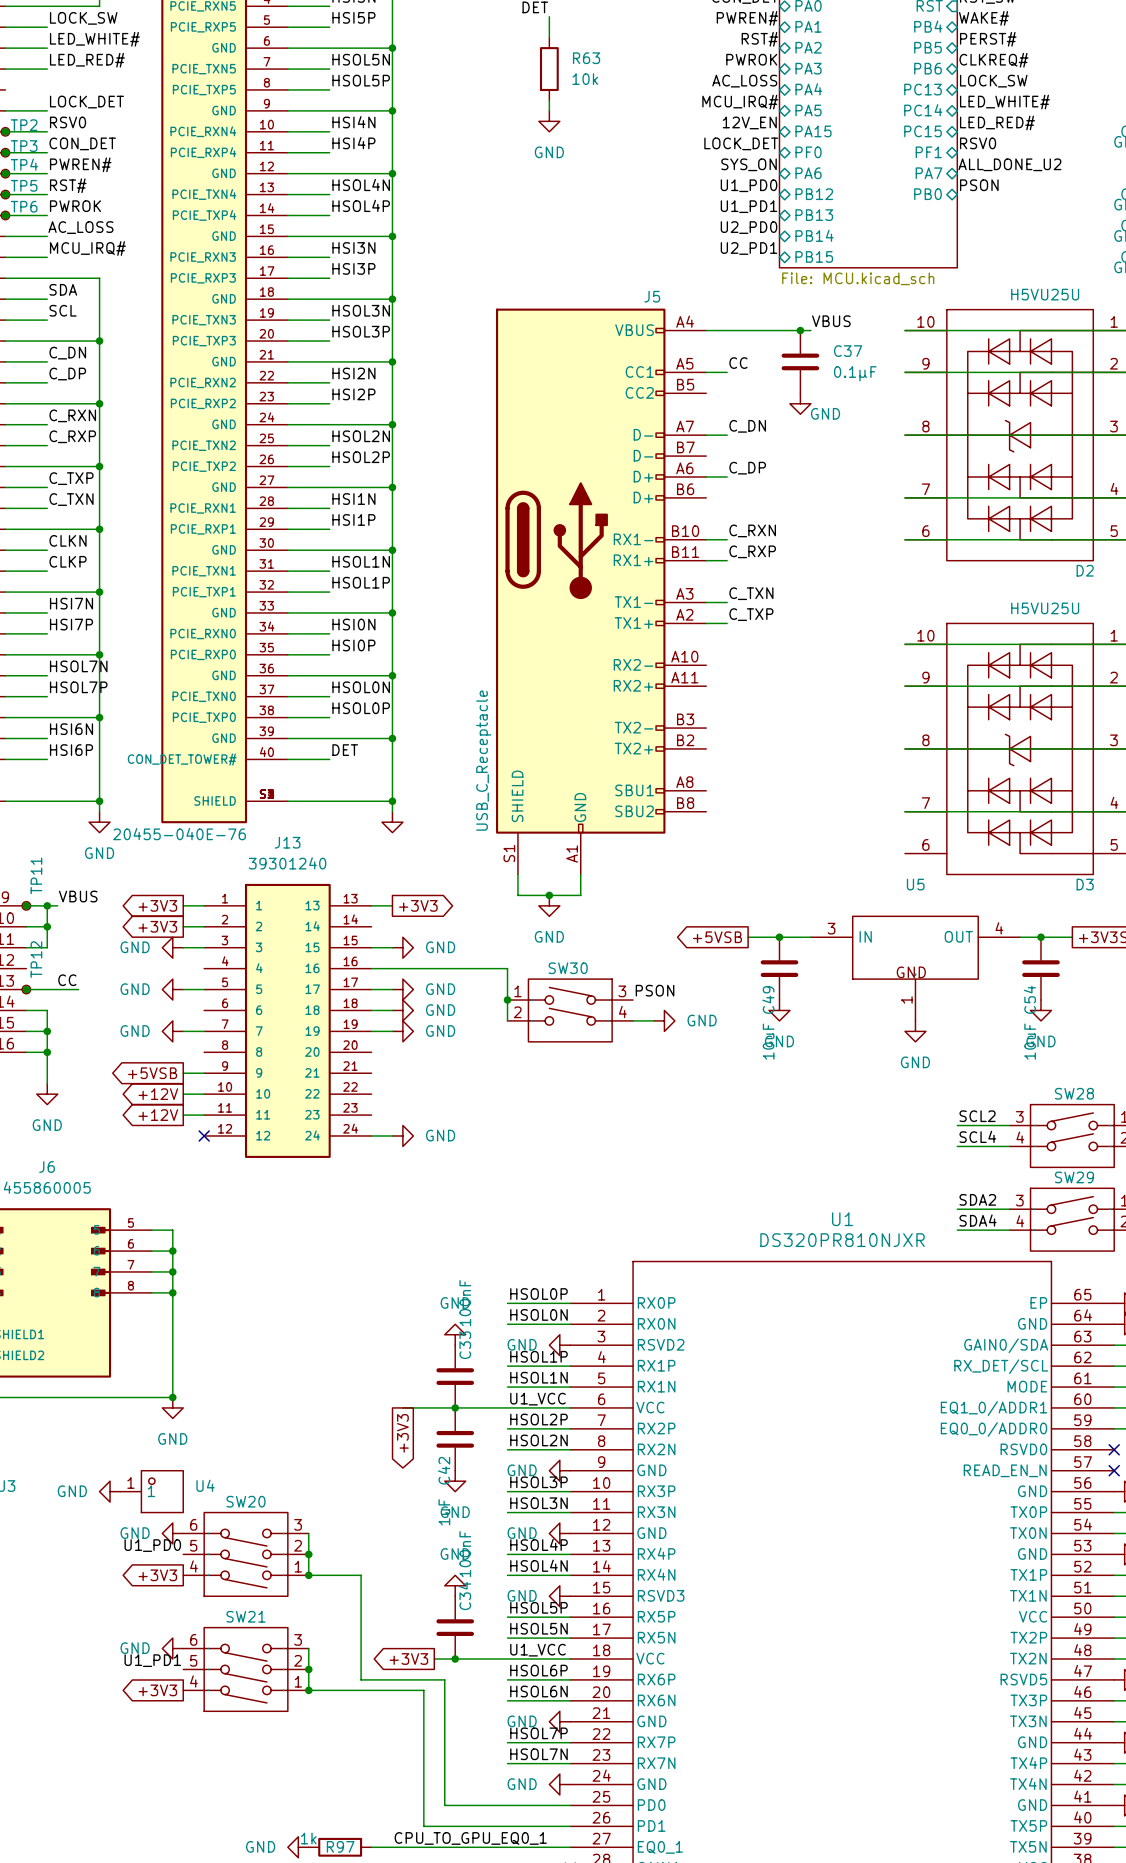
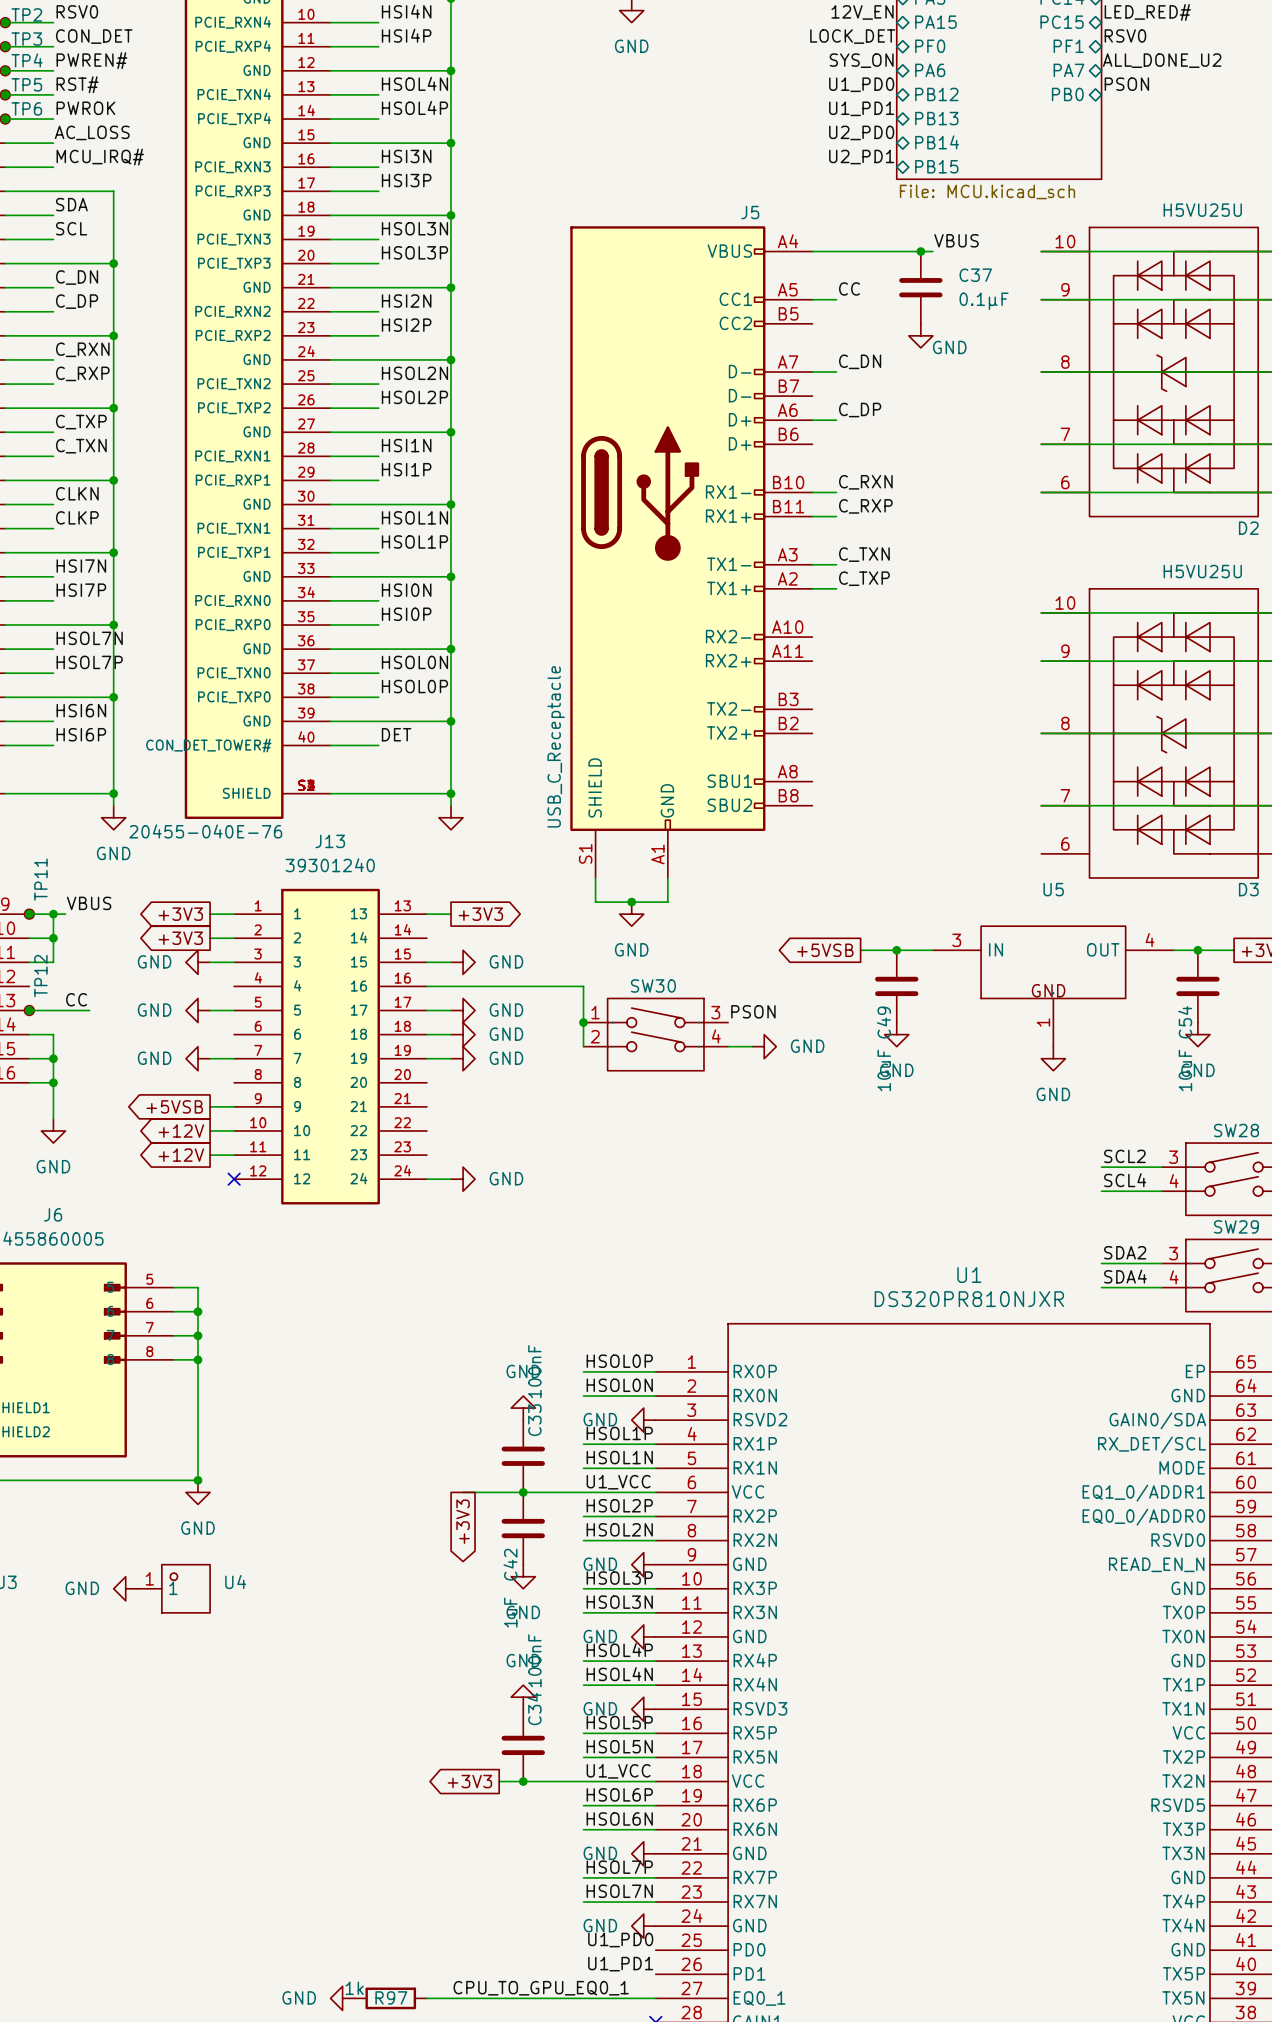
power symbol: GND (172, 1533) -> none
wire: (308, 1533) (308, 1575) (361, 1575) (361, 1679) (444, 1679) (444, 1805) (570, 1805) -> none
label: U1_PD0 (152, 1545) -> none
SW20: (246, 1554) -> none
junction: (308, 1554) -> none
global label: +3V3 (157, 1575) -> none
junction: (308, 1575) -> none
power symbol: GND (172, 1648) -> none
wire: (308, 1648) (308, 1690) (423, 1690) (423, 1826) (570, 1826) -> none
label: U1_PD1 (152, 1660) -> none
SW21: (246, 1669) -> none
junction: (308, 1669) -> none
global label: +3V3 (157, 1690) -> none
junction: (308, 1690) -> none
label: none -> U1_PD0 (620, 1940)
label: none -> U1_PD1 (620, 1964)

